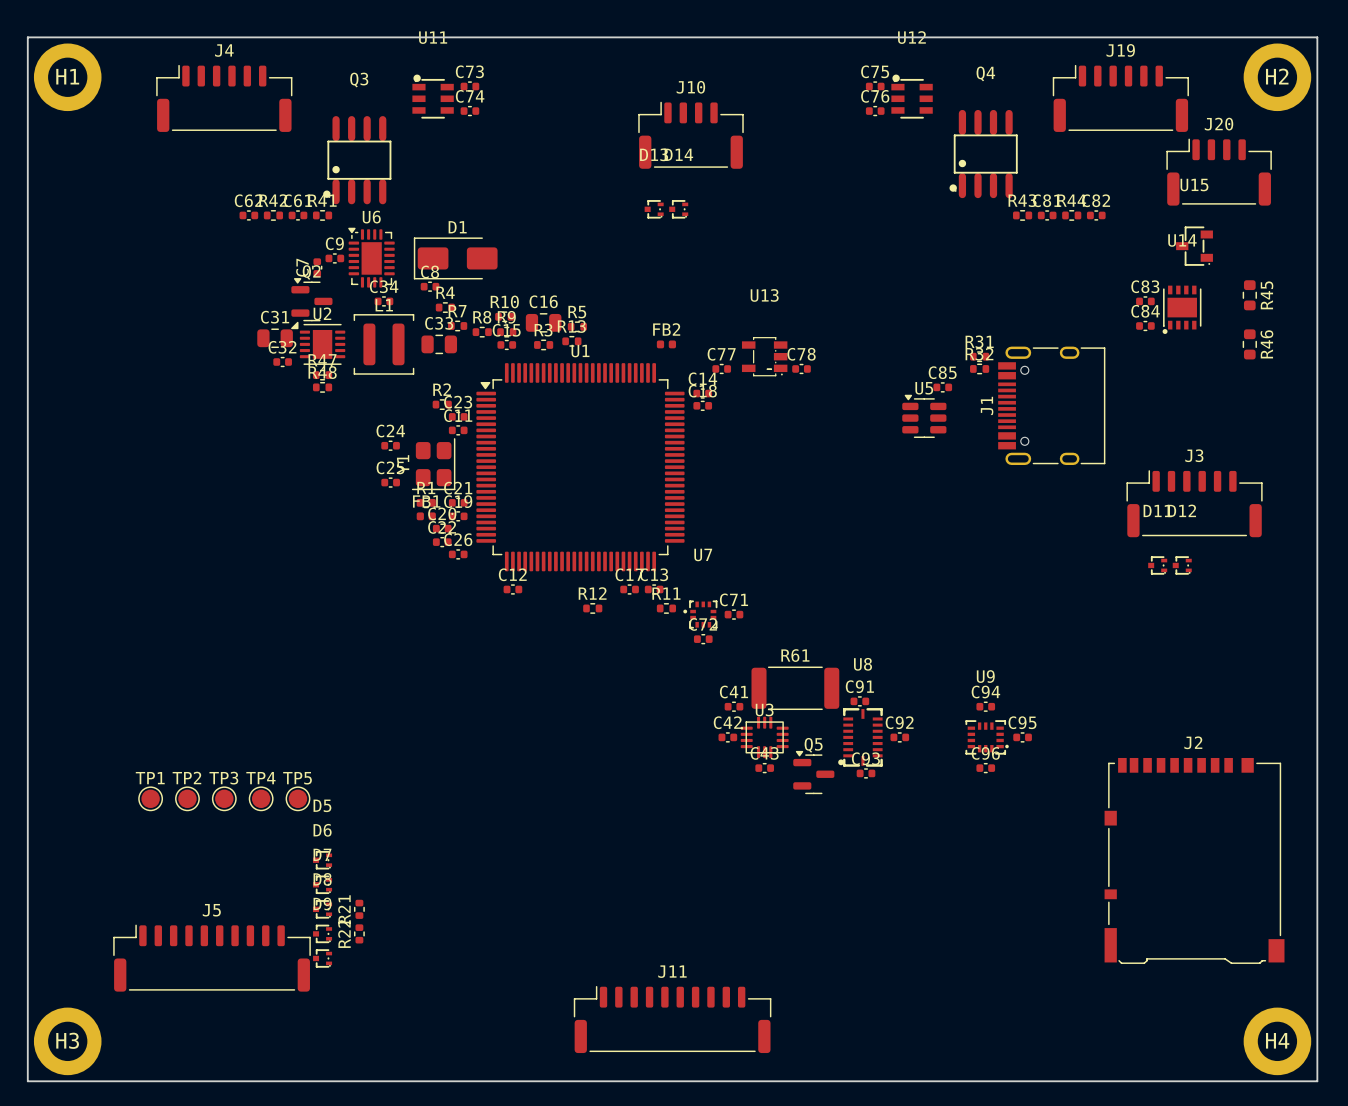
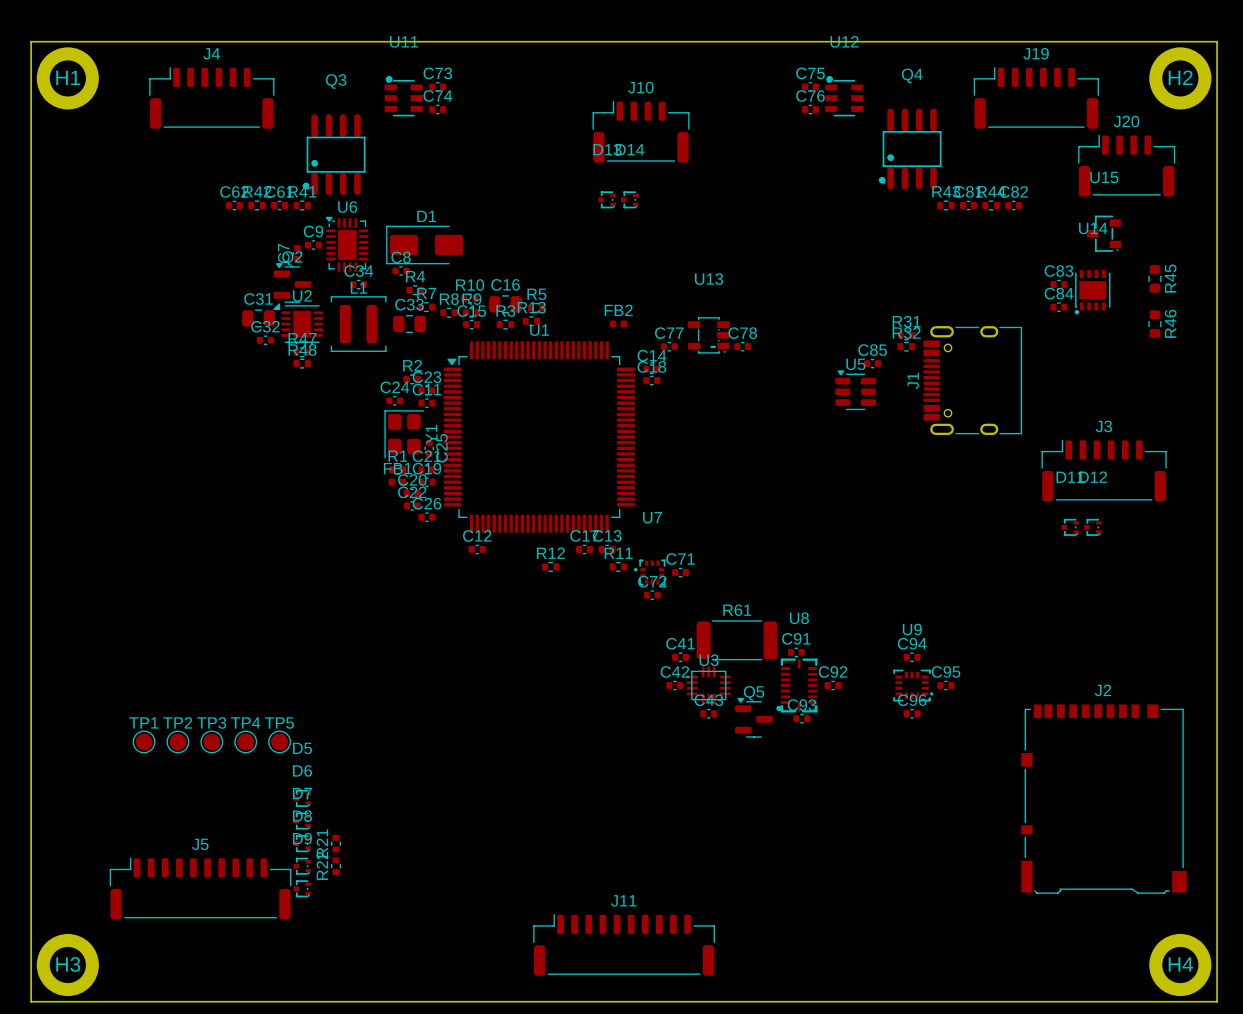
C24 position: (390, 445) -> (394, 400)
Y1 rotation: 0° (433, 464) -> 180° (404, 434)
C25 rotation: 0° (390, 482) -> 90° clockwise (429, 448)
C25 position: (390, 482) -> (429, 448)

